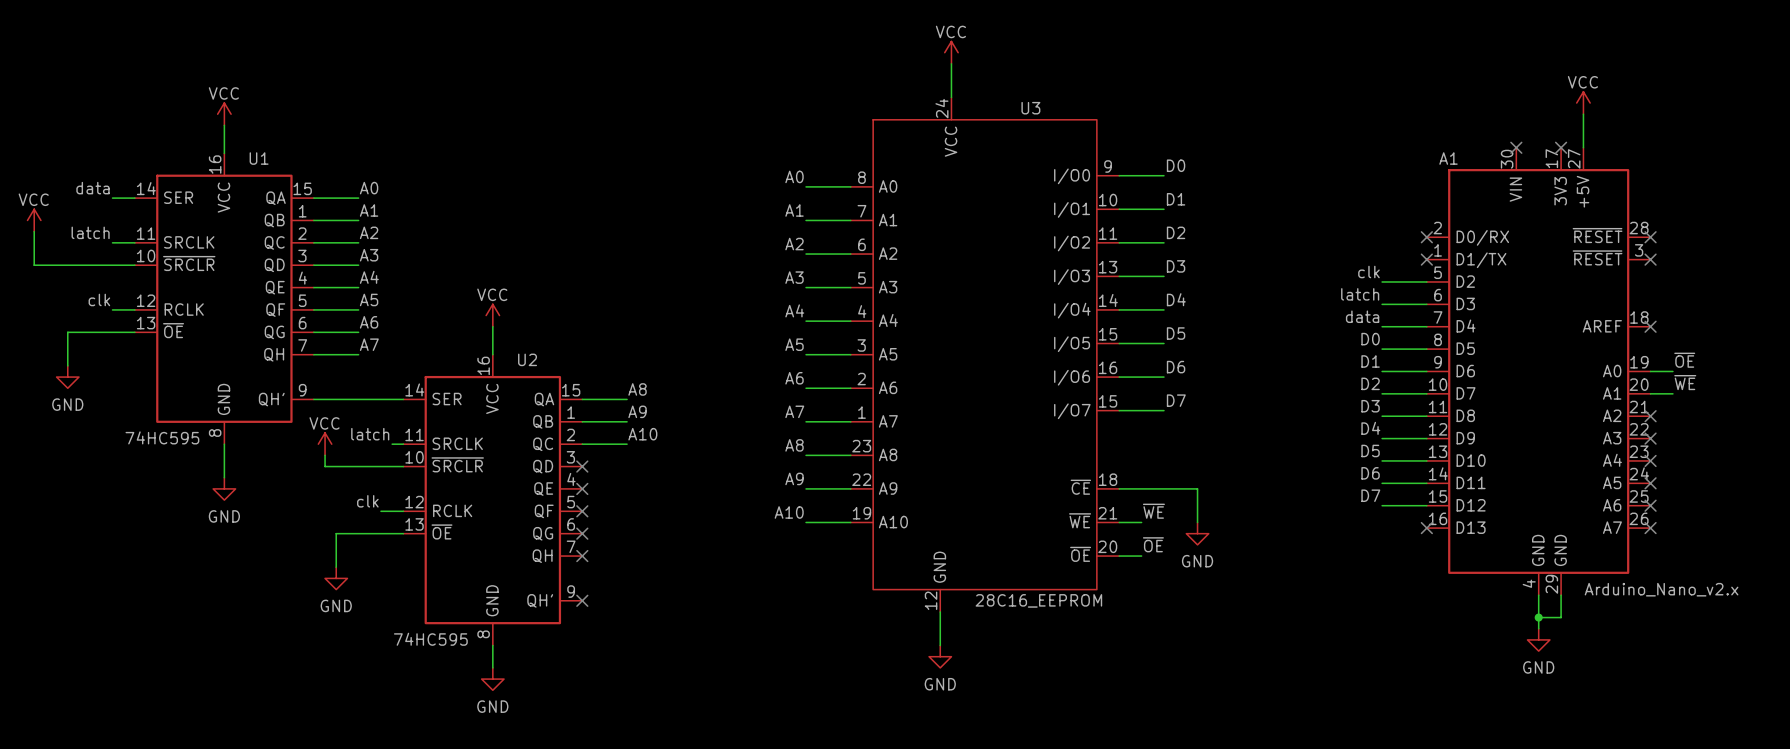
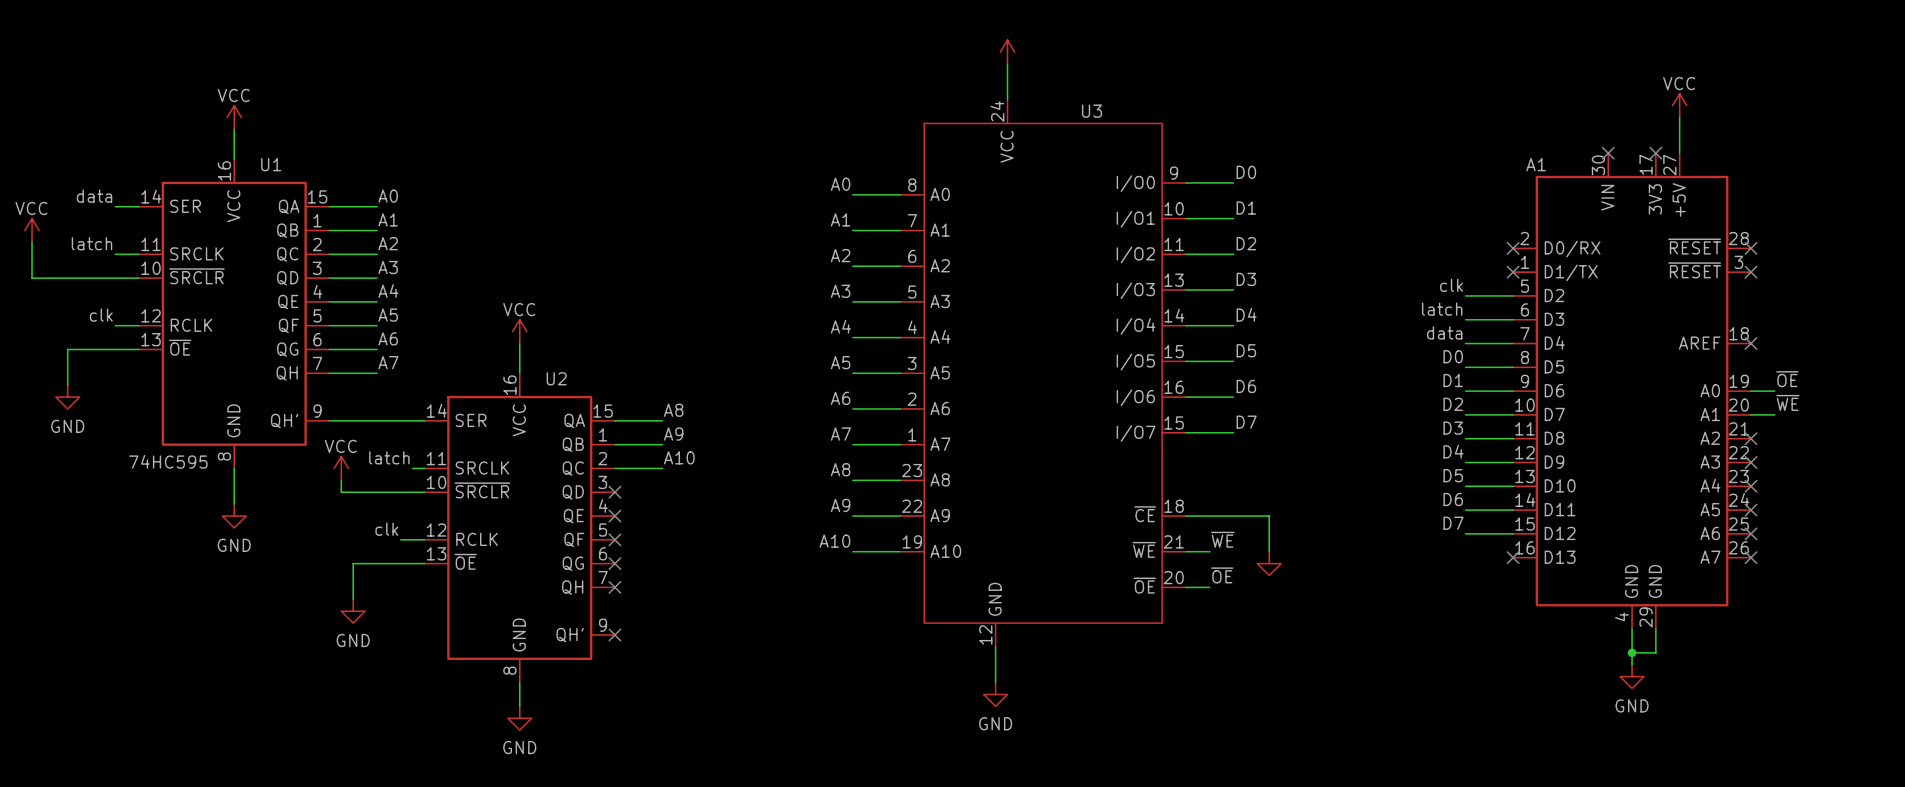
power symbol text: VCC (950, 31) -> none
power symbol text: GND (1197, 561) -> none
A1 value: Arduino_Nano_v2.x (1661, 589) -> none
U3 value: 28C16_EEPROM (1038, 600) -> none
U2 value: 74HC595 (430, 639) -> none

